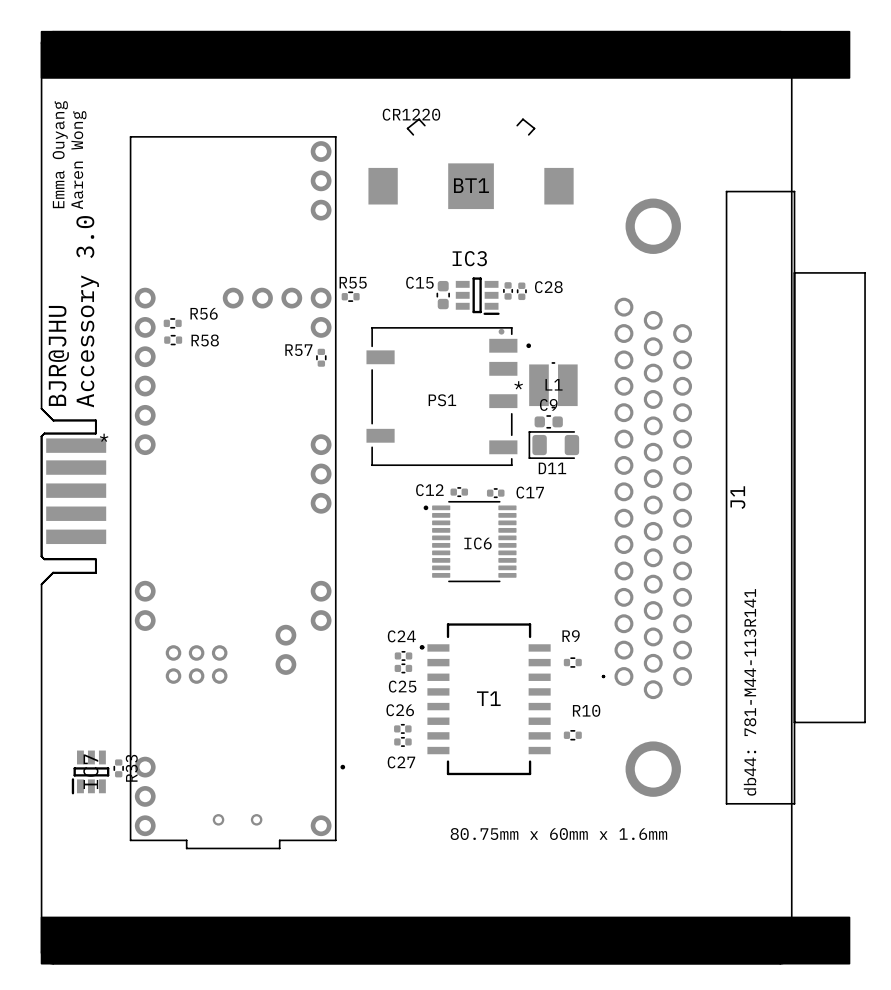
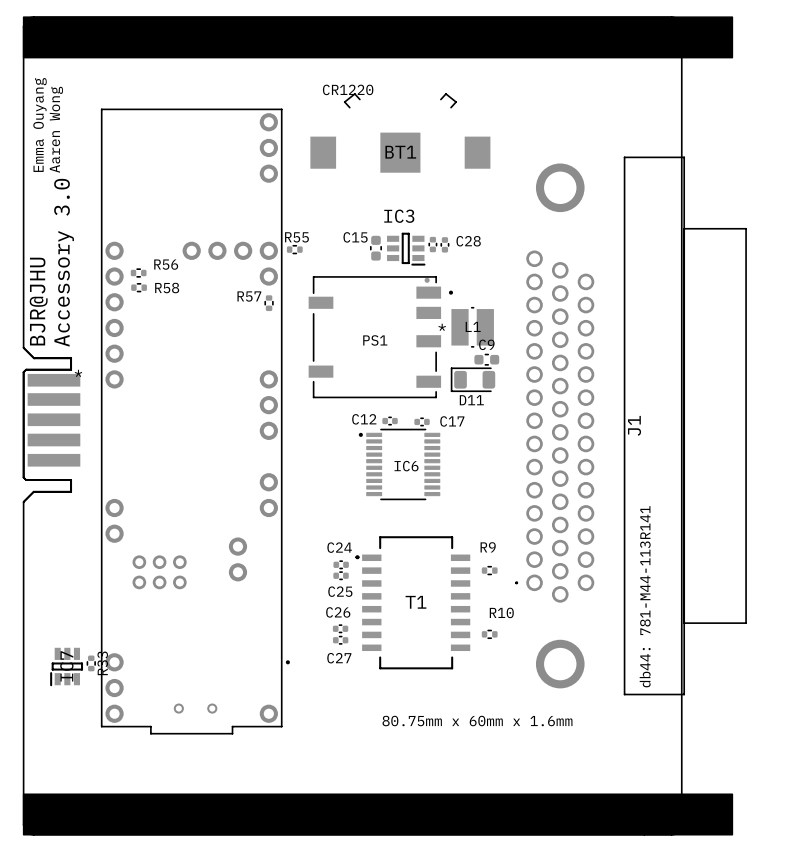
part footprint: [129, 136, 346, 850] -> [101, 108, 290, 735]
C9 position: (548, 421) -> (486, 359)

